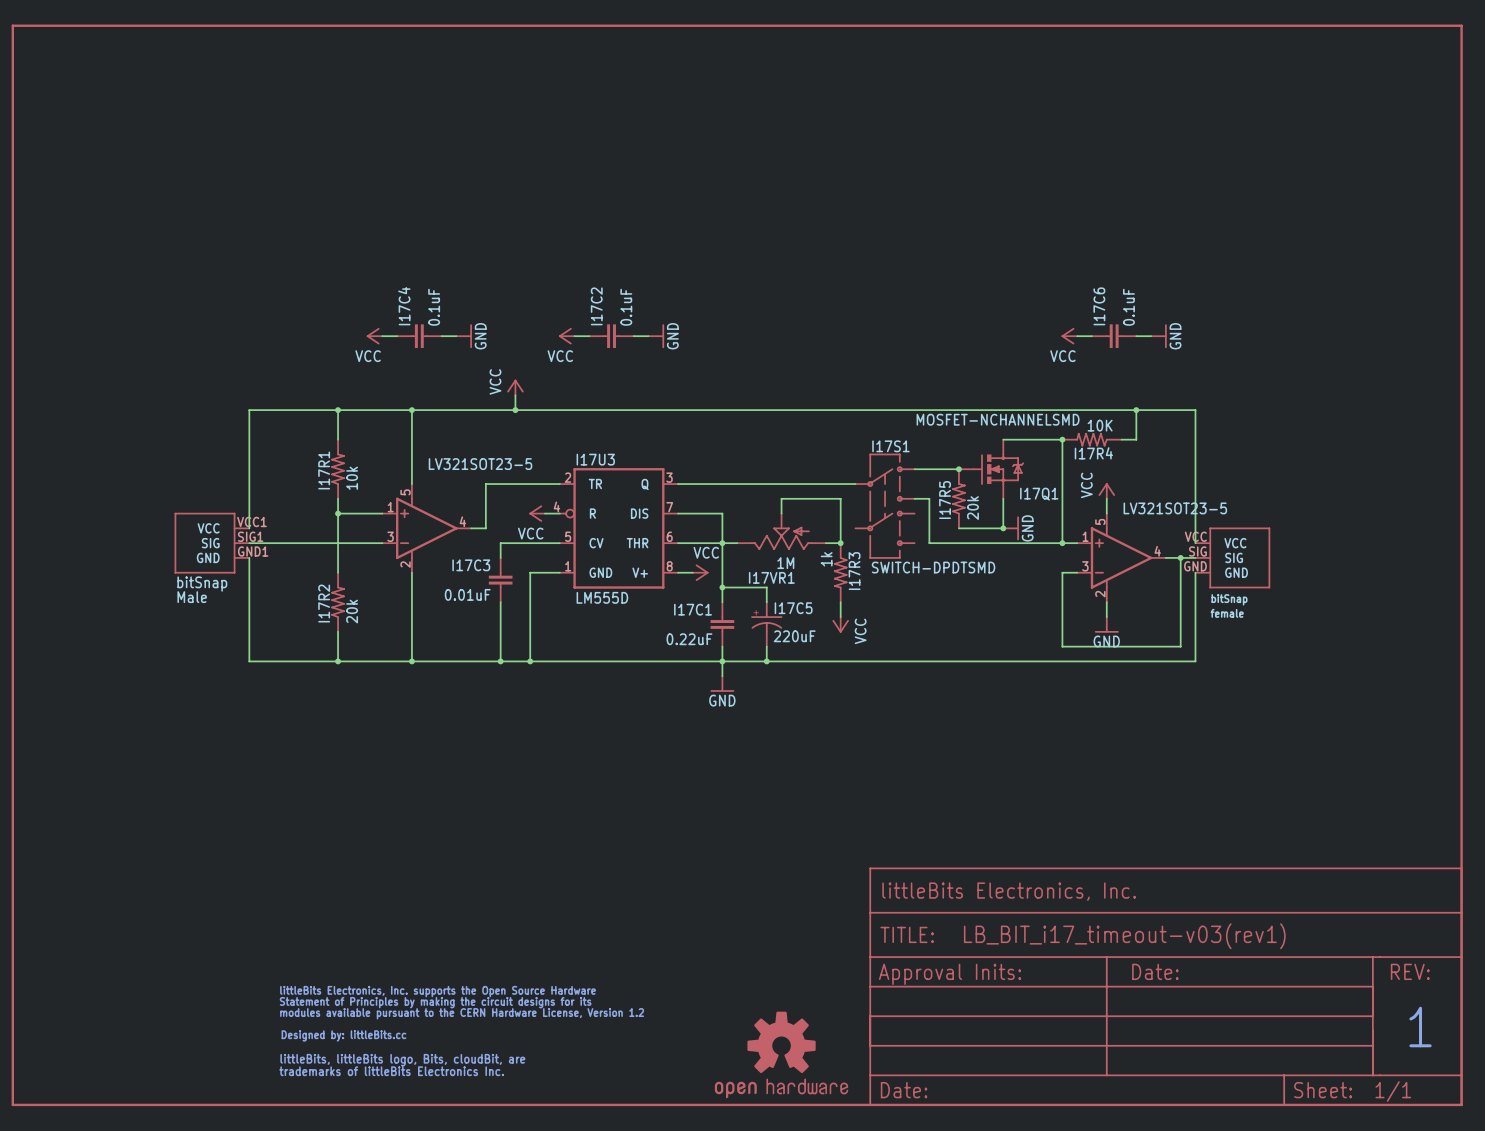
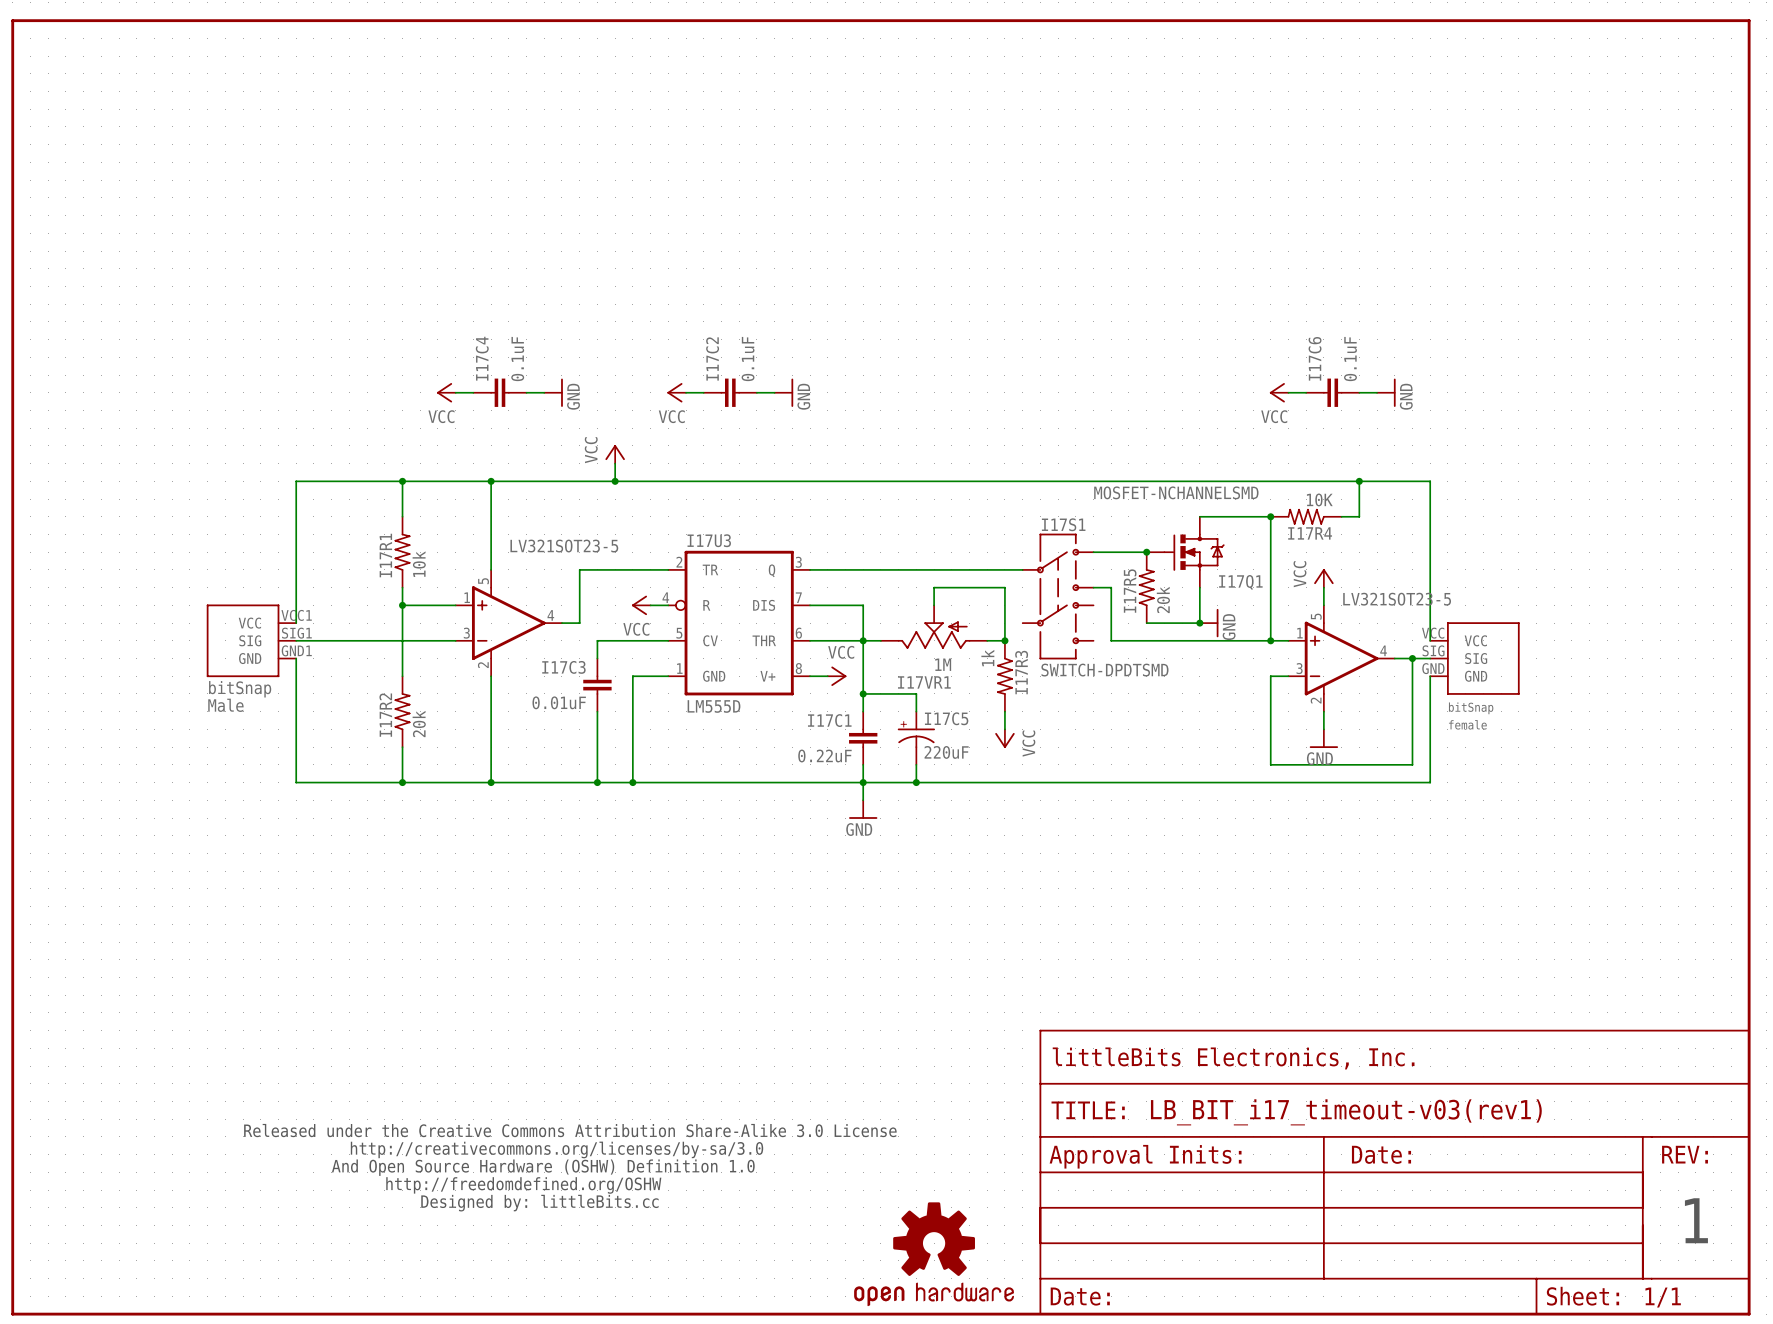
part: none -> (570, 1167)
part: (461, 1031) -> none

